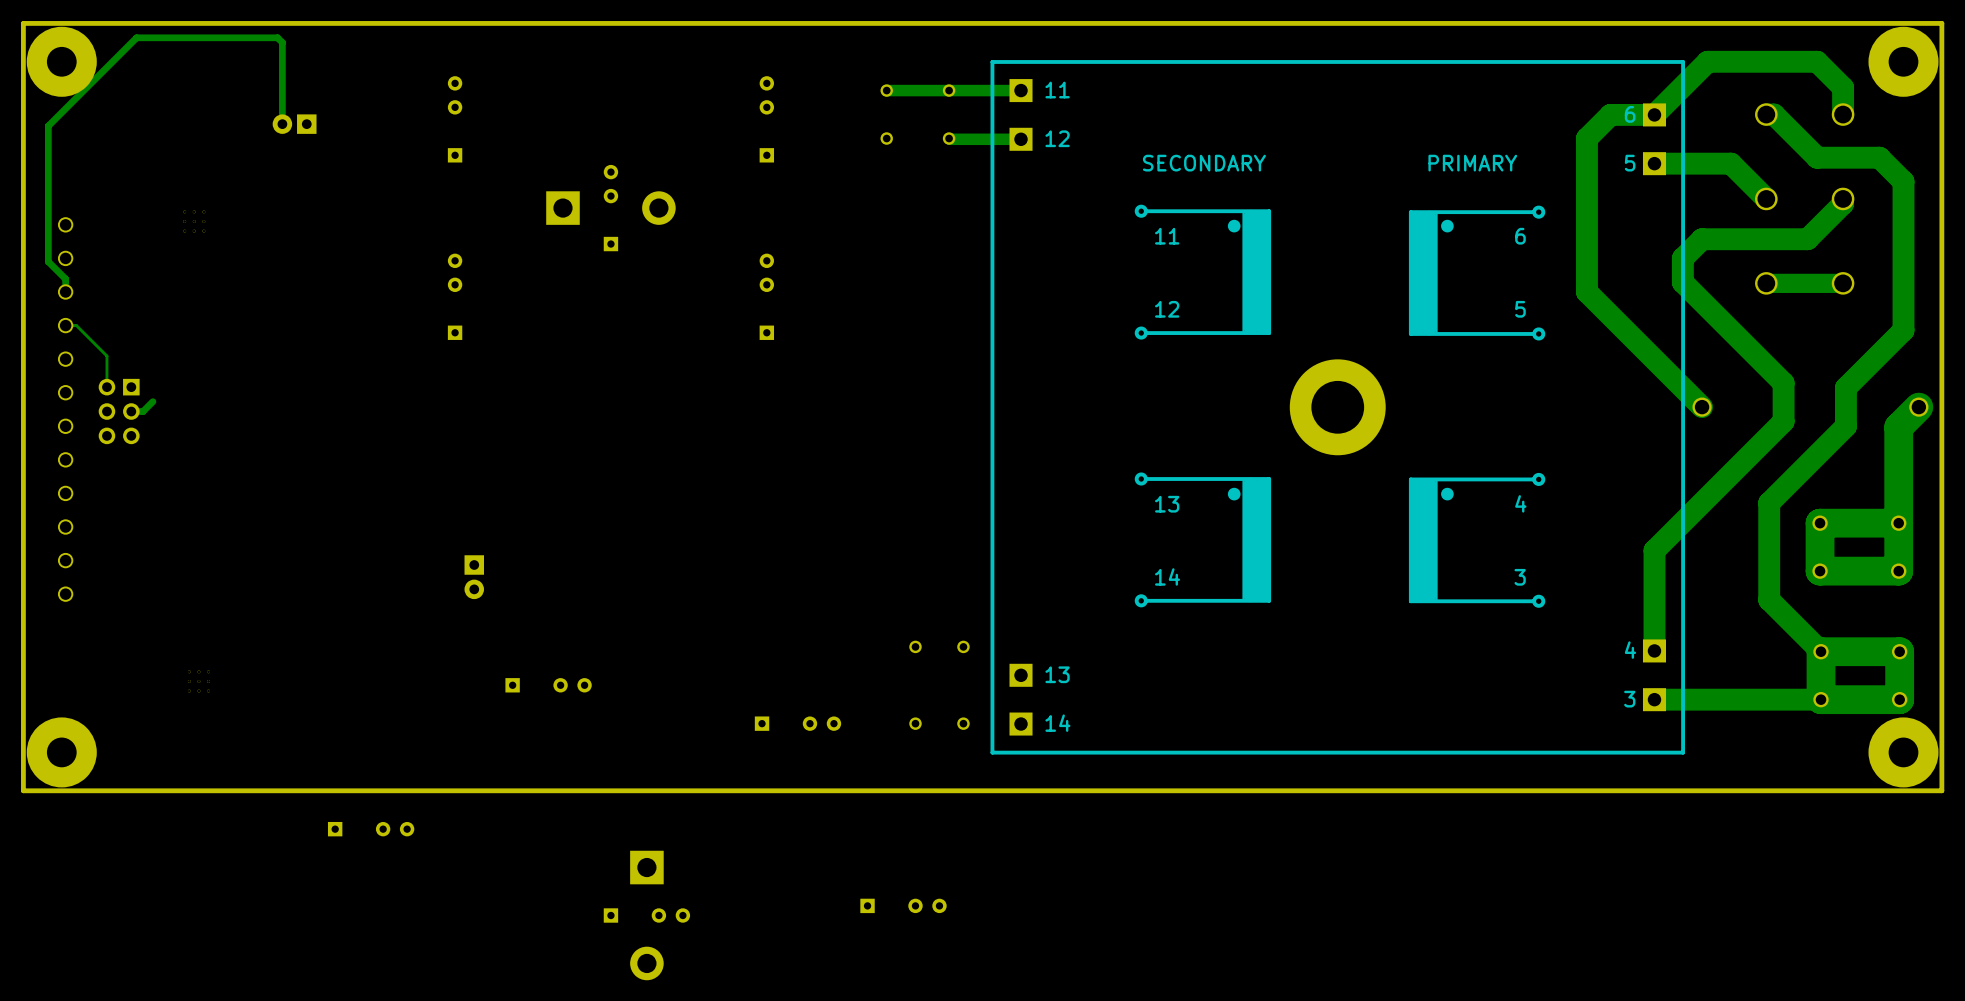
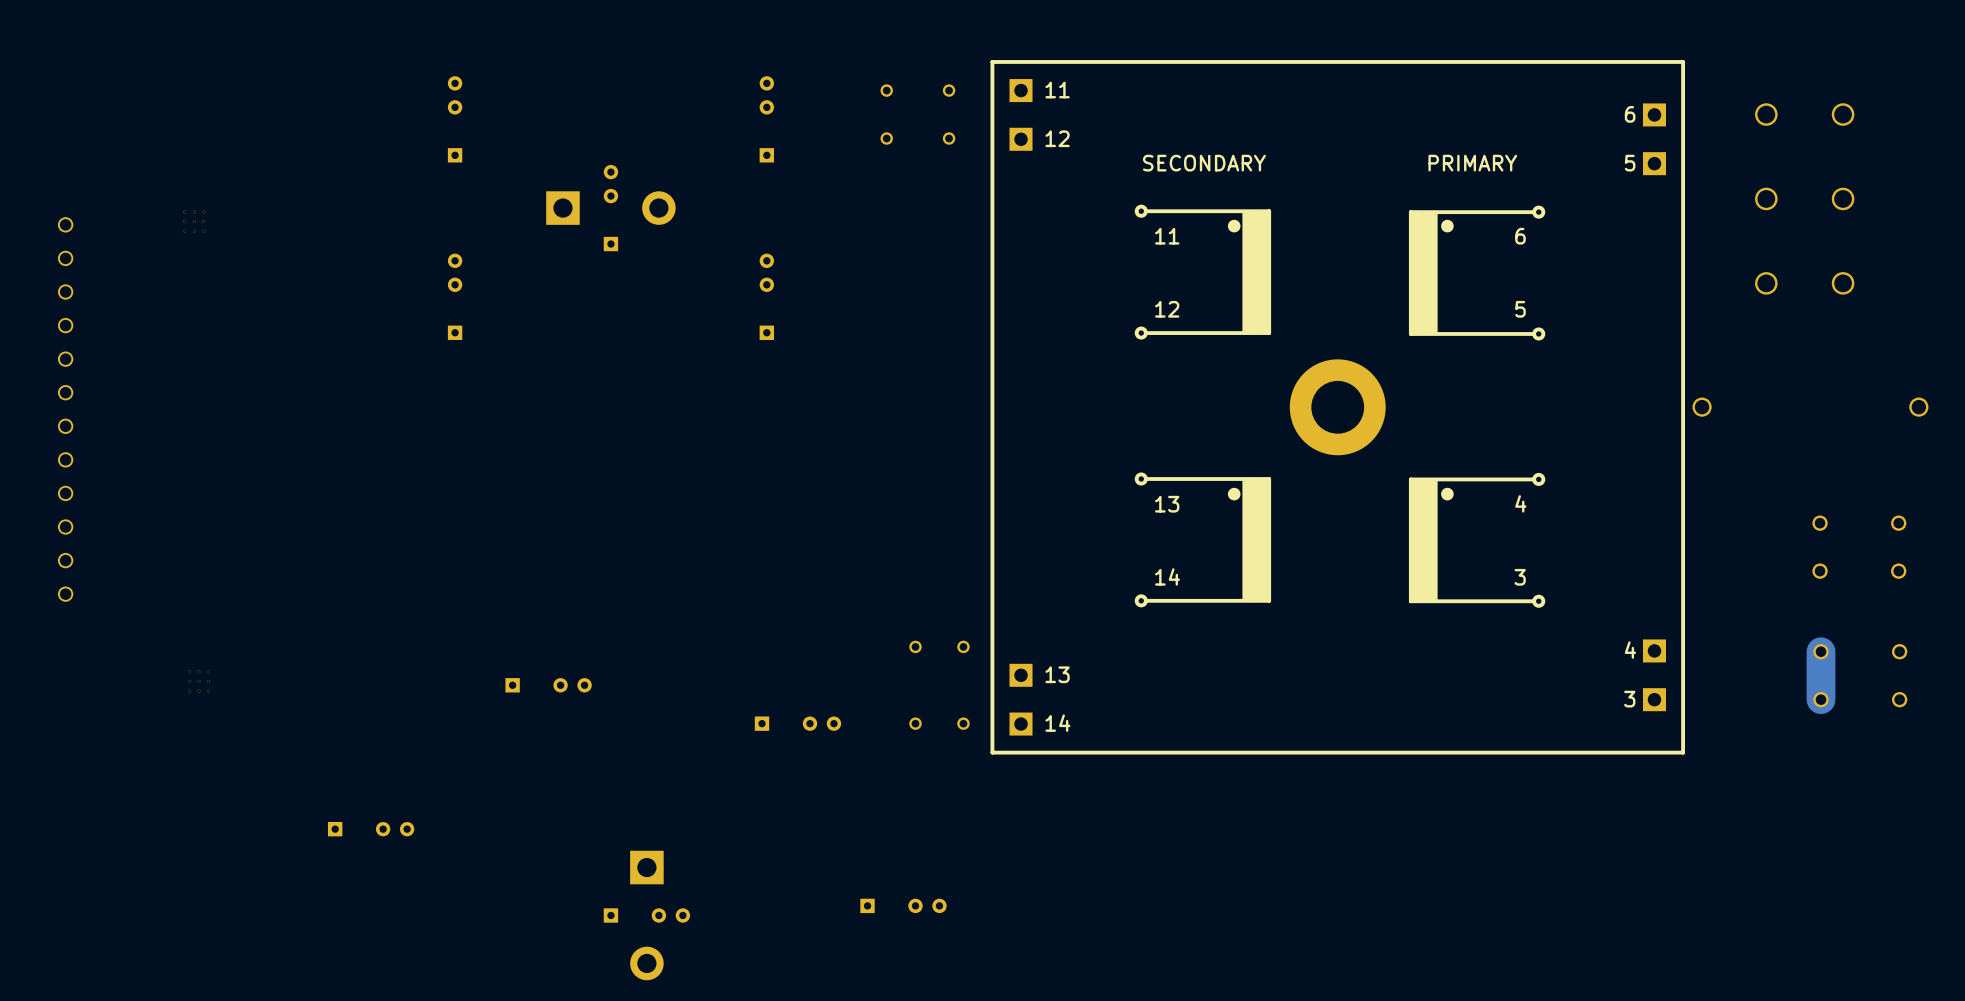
board edge: (1941, 23) (23, 23) (23, 790) (1941, 790) (1941, 23) -> none
part: (61, 61) -> none
part: (1903, 61) -> none
track: (1021, 90) (886, 90) -> none
track: (1766, 114) (1774, 114) (1817, 157) (1879, 157) (1903, 181) (1903, 330) (1845, 387) (1845, 426) (1769, 503) (1769, 599) (1821, 651) (1899, 651) (1899, 699) (1654, 699) -> none
track: (1843, 114) (1843, 87) (1817, 61) (1707, 61) (1654, 114) (1610, 114) (1586, 138) (1586, 292) (1702, 407) -> none
track: (282, 124) (282, 42) (277, 37) (136, 37) (48, 126) (48, 261) (65, 279) (65, 292) -> none
part: (294, 124) -> none
track: (949, 138) (1021, 139) -> none
track: (1654, 163) (1731, 163) (1766, 198) -> none
track: (1843, 198) (1843, 203) (1807, 239) (1702, 239) (1682, 258) (1682, 282) (1783, 383) (1783, 421) (1654, 550) (1654, 650) -> none
track: (1843, 283) (1766, 283) -> none
track: (65, 325) (76, 325) (106, 356) (106, 387) -> none
track: (152, 401) (143, 411) (131, 411) -> none
track: (1918, 407) (1898, 427) (1898, 571) (1820, 571) (1820, 523) (1898, 523) -> none
part: (119, 411) -> none
part: (474, 577) -> none
part: (61, 752) -> none
part: (1903, 752) -> none

